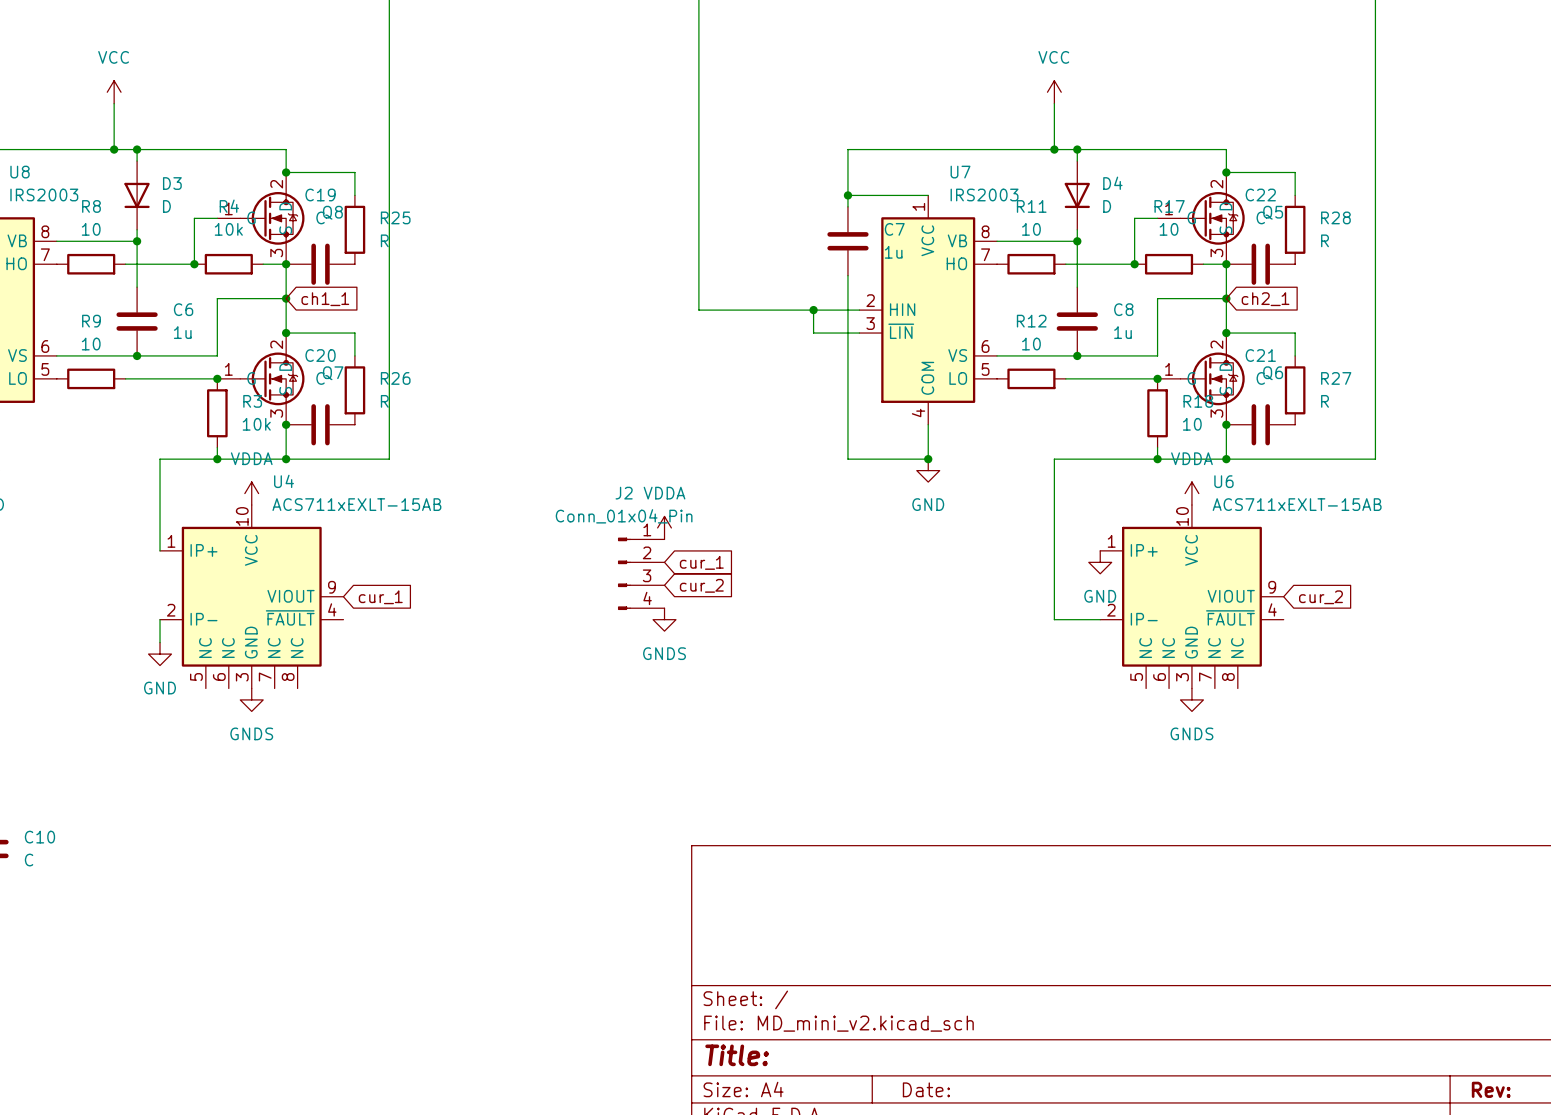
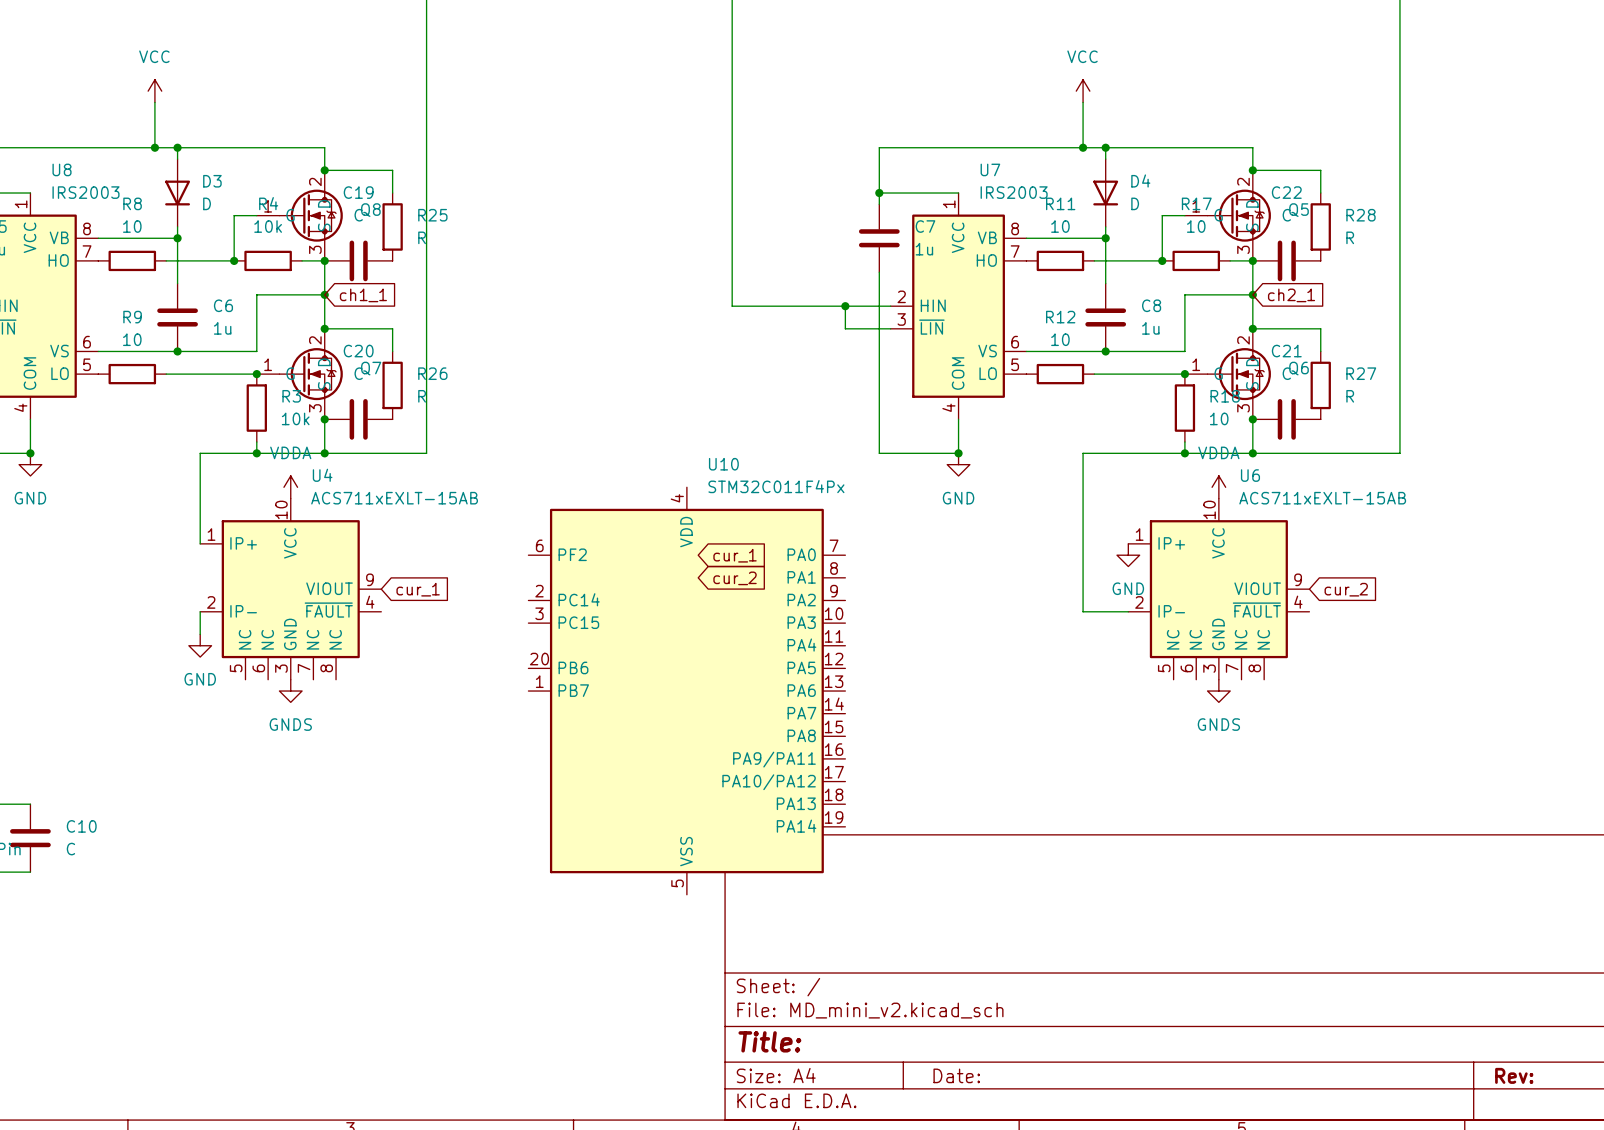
power symbol: VDDA (664, 527) -> none
J2: Conn_01x04_Pin (641, 573) -> none
power symbol: GNDS (664, 619) -> none
U10: none -> STM32C011F4Px (686, 691)

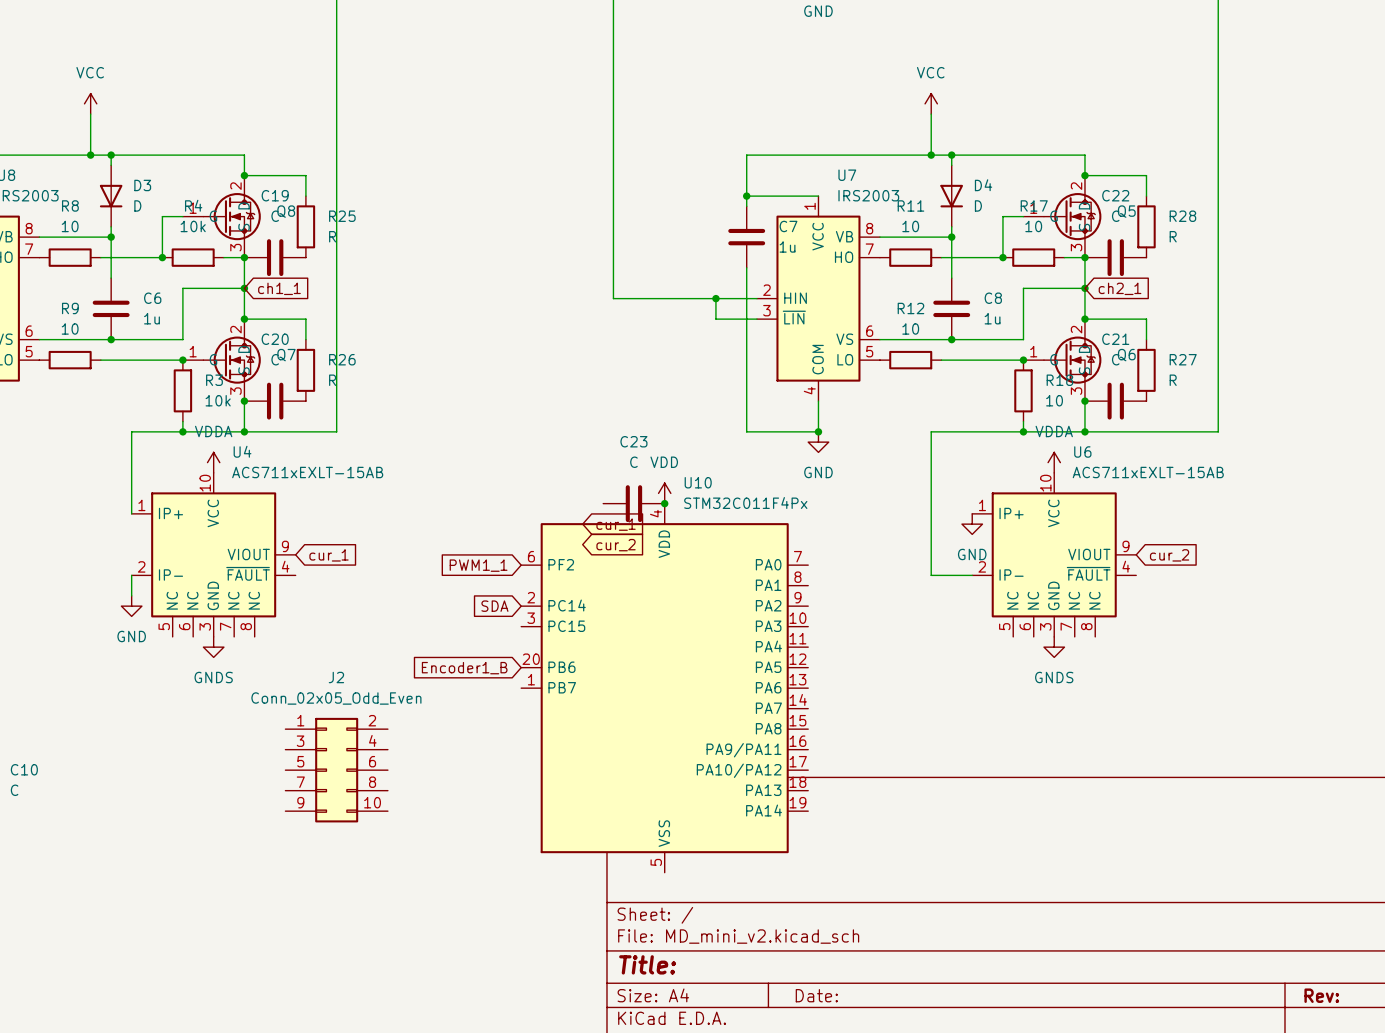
power symbol: none -> VDD (664, 493)
C23: none -> C (633, 503)
junction: none -> (664, 503)
global label: none -> PWM1_1 (478, 565)
global label: none -> SDA (494, 606)
U10 position: (686, 691) -> (664, 688)
global label: none -> Encoder1_B (464, 668)
J2: none -> Conn_02x05_Odd_Even (336, 770)

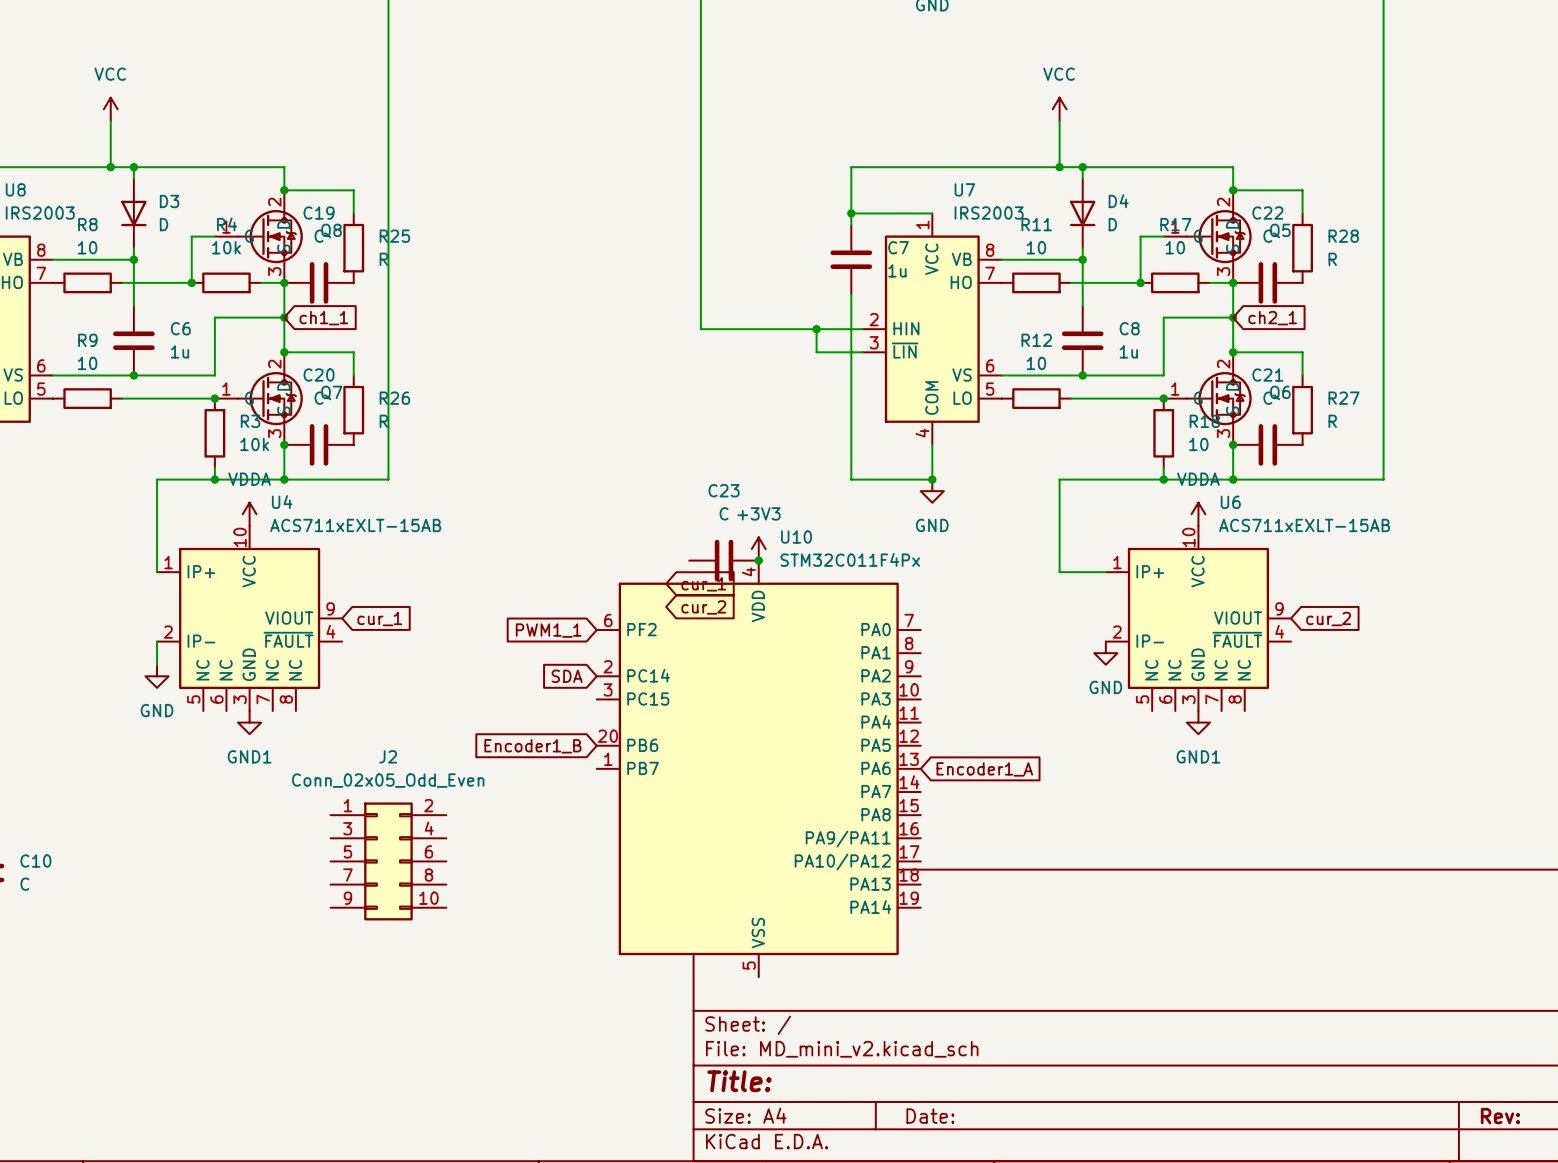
power symbol: VDD (664, 493) -> +3V3 (758, 549)
wire: (931, 513) (931, 575) (972, 575) -> (1059, 572) (1105, 572)
power symbol position: GND (972, 524) -> GND (1105, 653)
power symbol: GNDS (213, 647) -> GND1 (249, 722)
power symbol: GNDS (1054, 647) -> GND1 (1198, 722)
global label: none -> Encoder1_A (984, 769)

